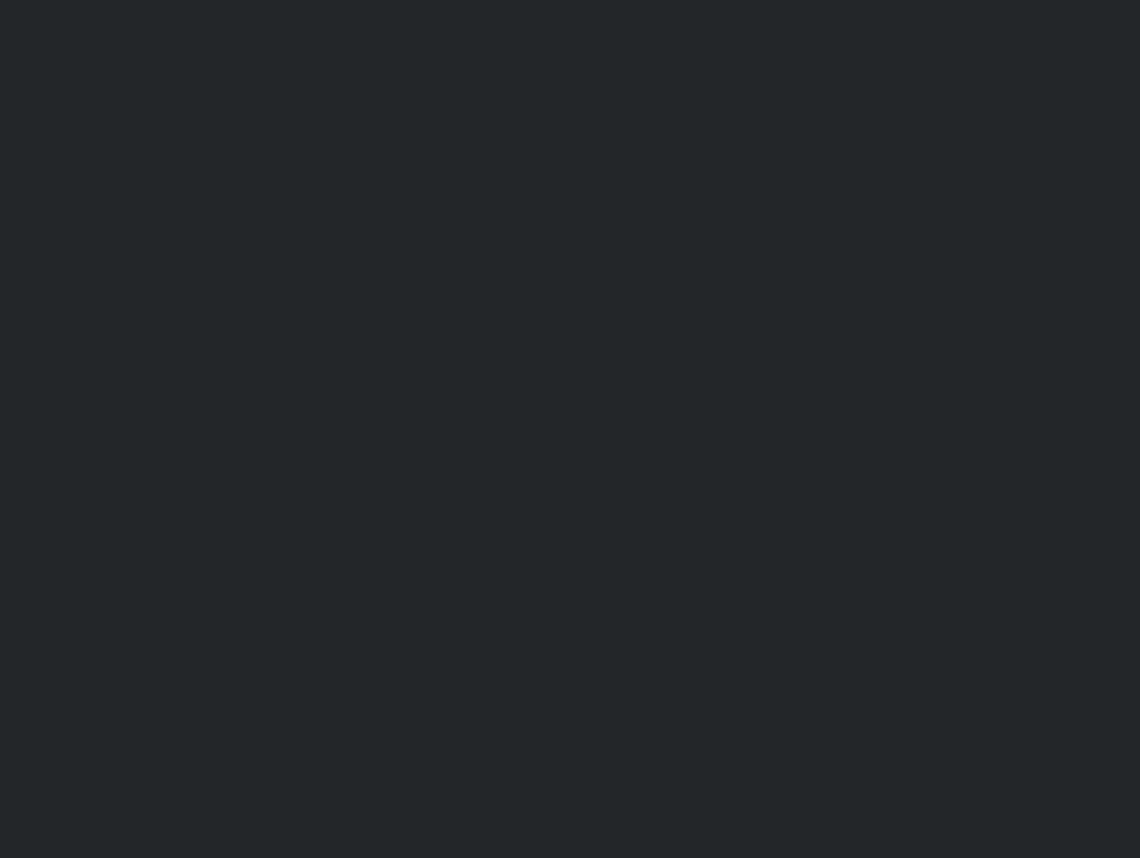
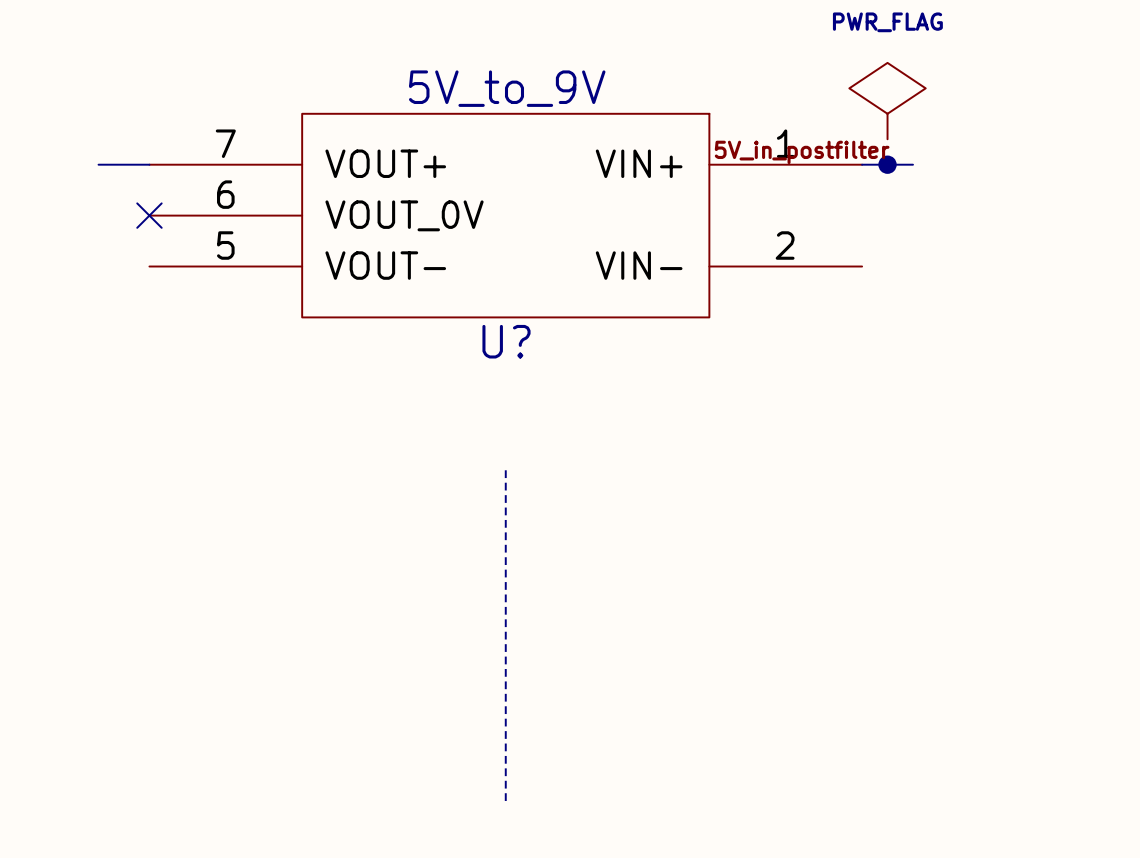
power symbol: none -> PWR_FLAG (887, 101)
label: none -> 5V_in_postfilter (802, 152)
wire: none -> (98, 164) (149, 164)
wire: none -> (862, 164) (912, 164)
junction: none -> (887, 164)
no-connect mark: none -> (149, 215)
U?: none -> 5V_to_9V (505, 215)
line: none -> (505, 470) (505, 800)

